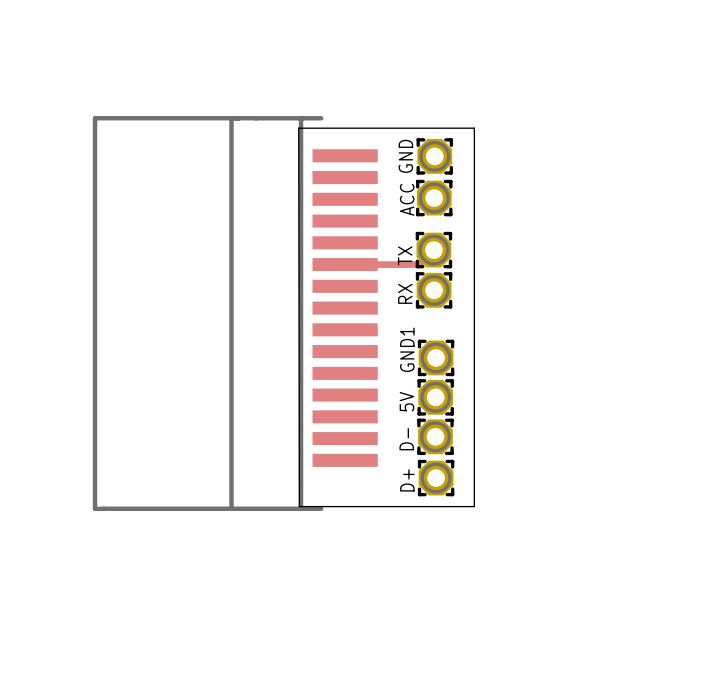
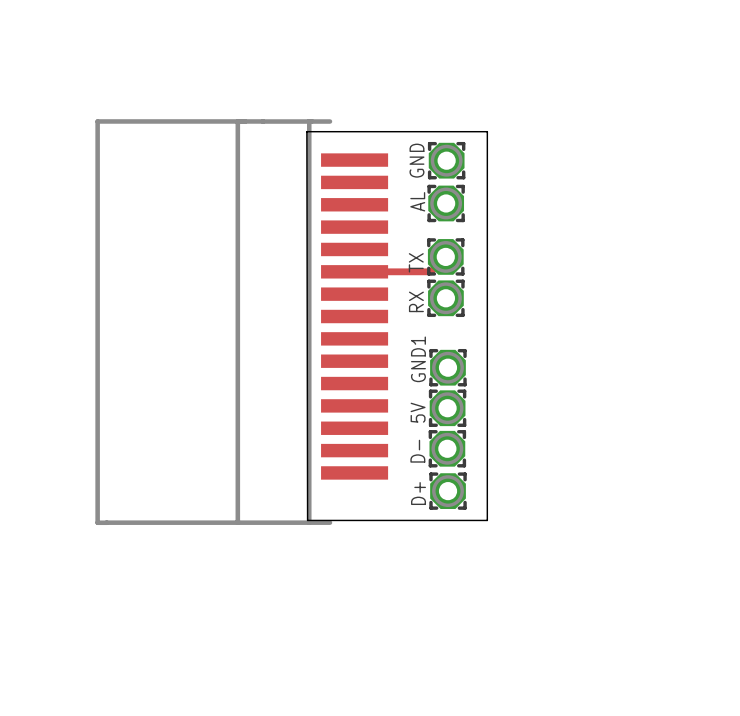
ACC name: ACC (407, 199) -> AL (417, 201)

